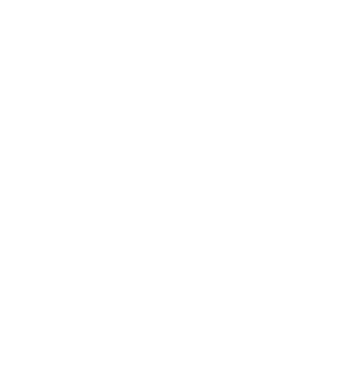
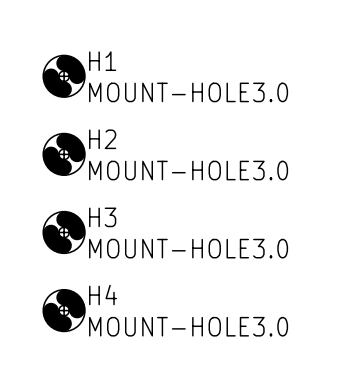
H1: none -> MOUNT-HOLE3.0 (64, 76)
H2: none -> MOUNT-HOLE3.0 (64, 154)
H3: none -> MOUNT-HOLE3.0 (64, 232)
H4: none -> MOUNT-HOLE3.0 (64, 310)

